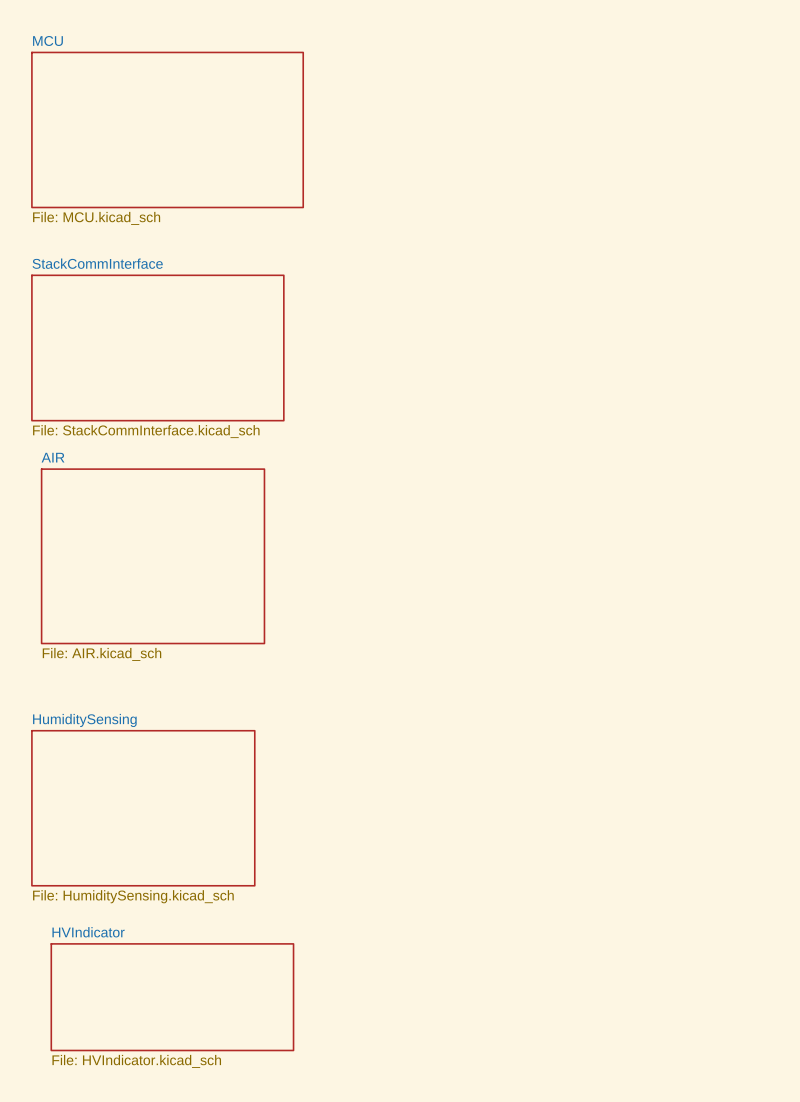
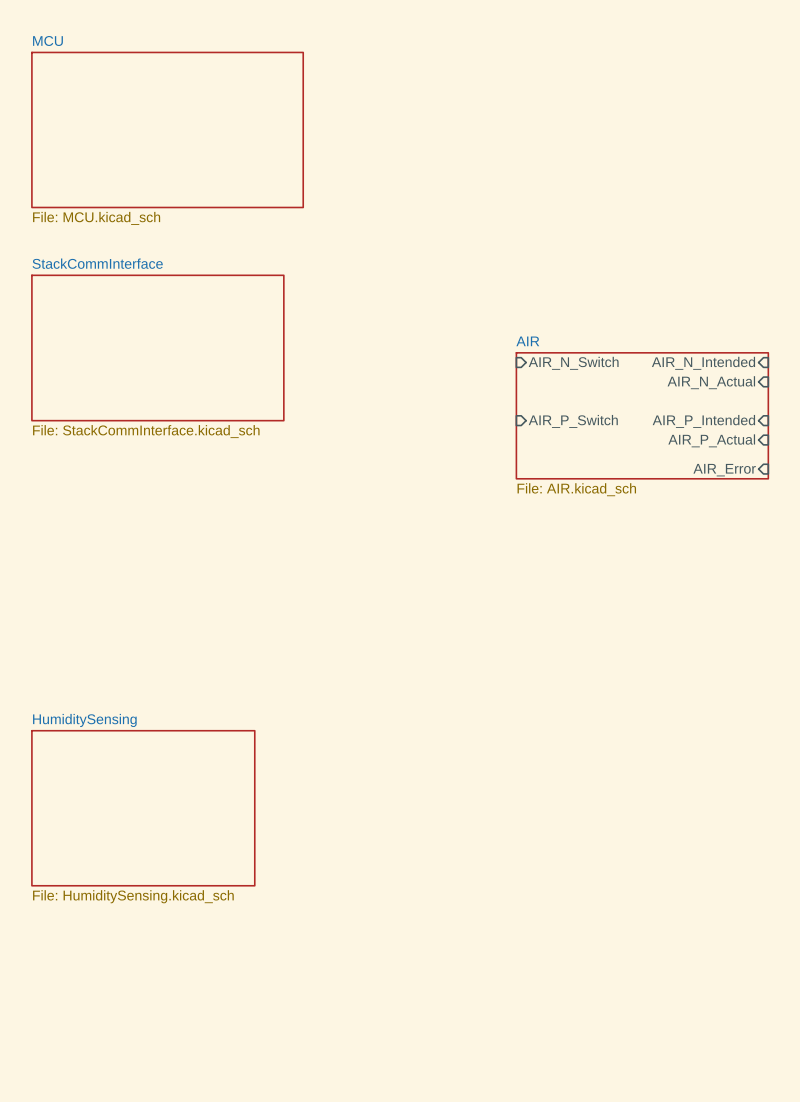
sheet pin: none -> AIR_N_Switch (573, 363)
sheet pin: none -> AIR_N_Intended (703, 363)
sheet pin: none -> AIR_N_Actual (711, 382)
sheet AIR: none -> File: AIR.kicad_sch (642, 415)
sheet pin: none -> AIR_P_Switch (573, 421)
sheet pin: none -> AIR_P_Intended (703, 421)
sheet pin: none -> AIR_P_Actual (711, 440)
sheet pin: none -> AIR_Error (724, 470)
sheet AIR: File: AIR.kicad_sch (153, 556) -> none
sheet HVIndicator: File: HVIndicator.kicad_sch (172, 997) -> none

